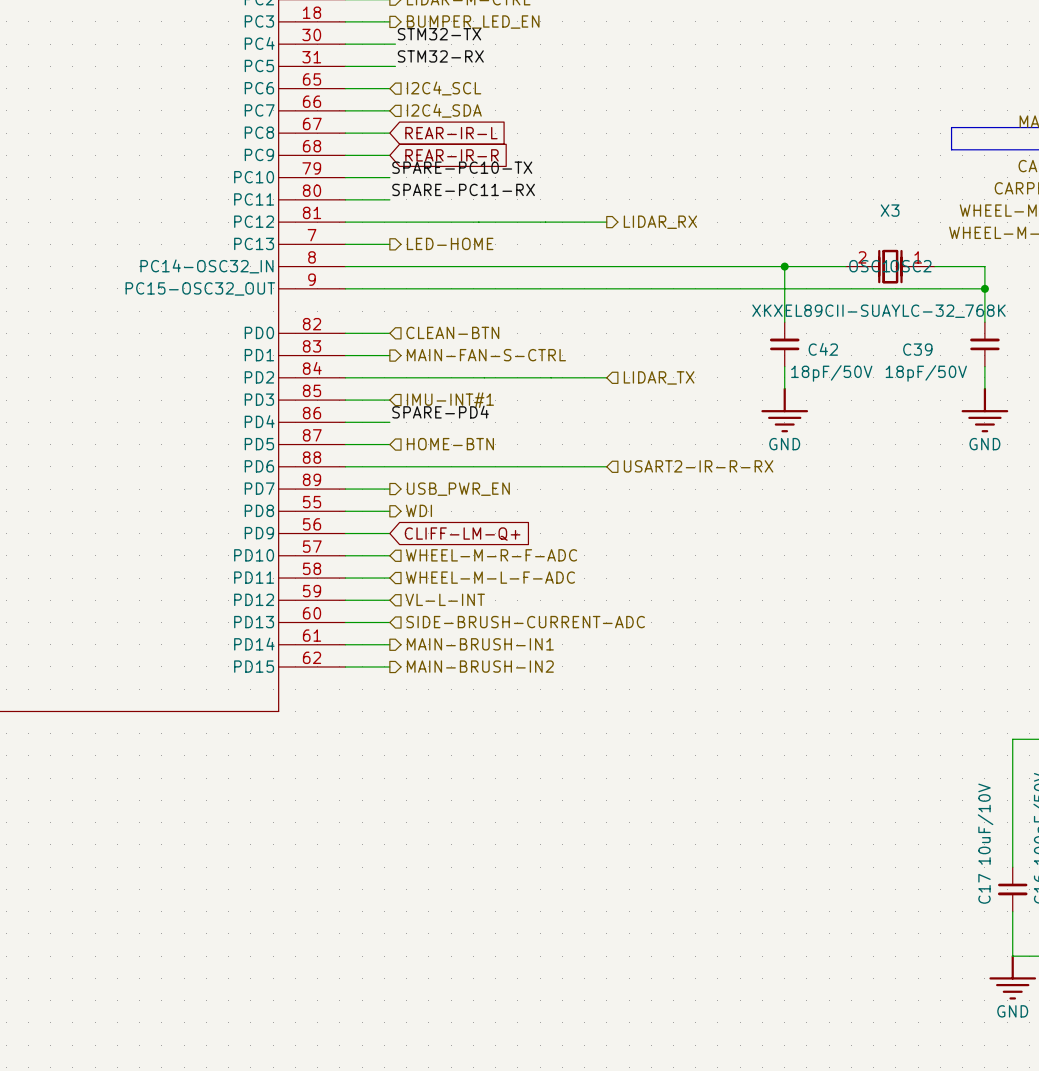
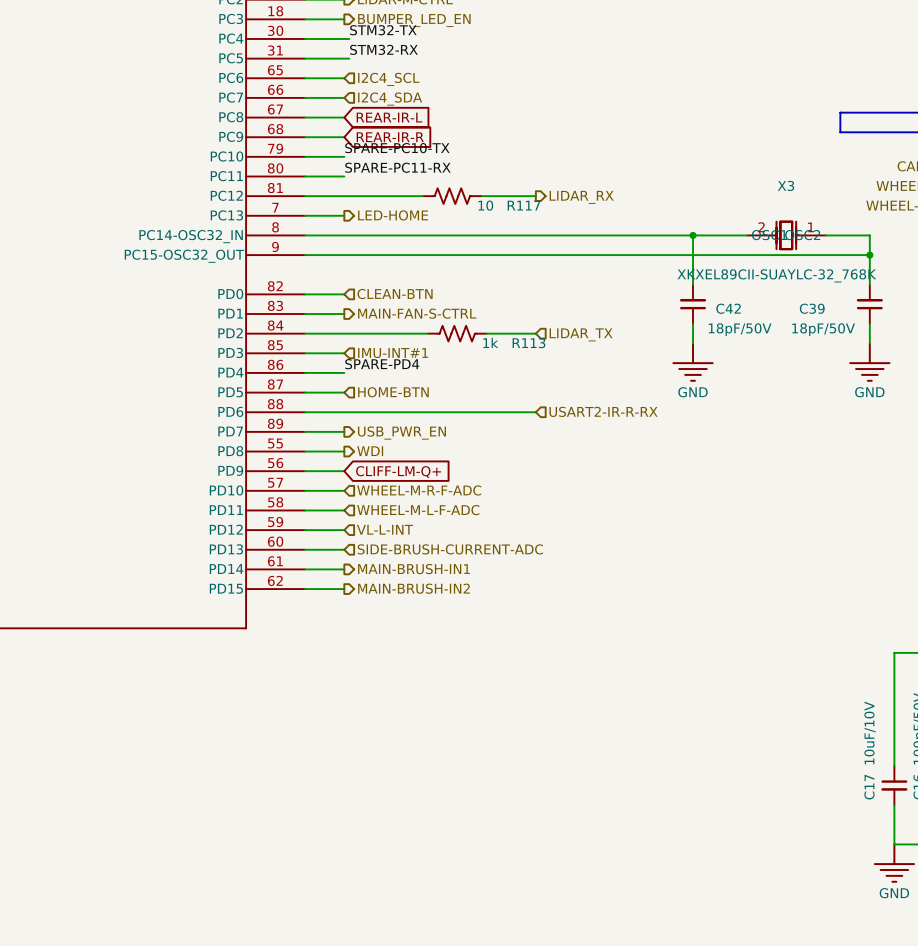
R117: none -> 10 (452, 196)
R113: none -> 1k (457, 333)

